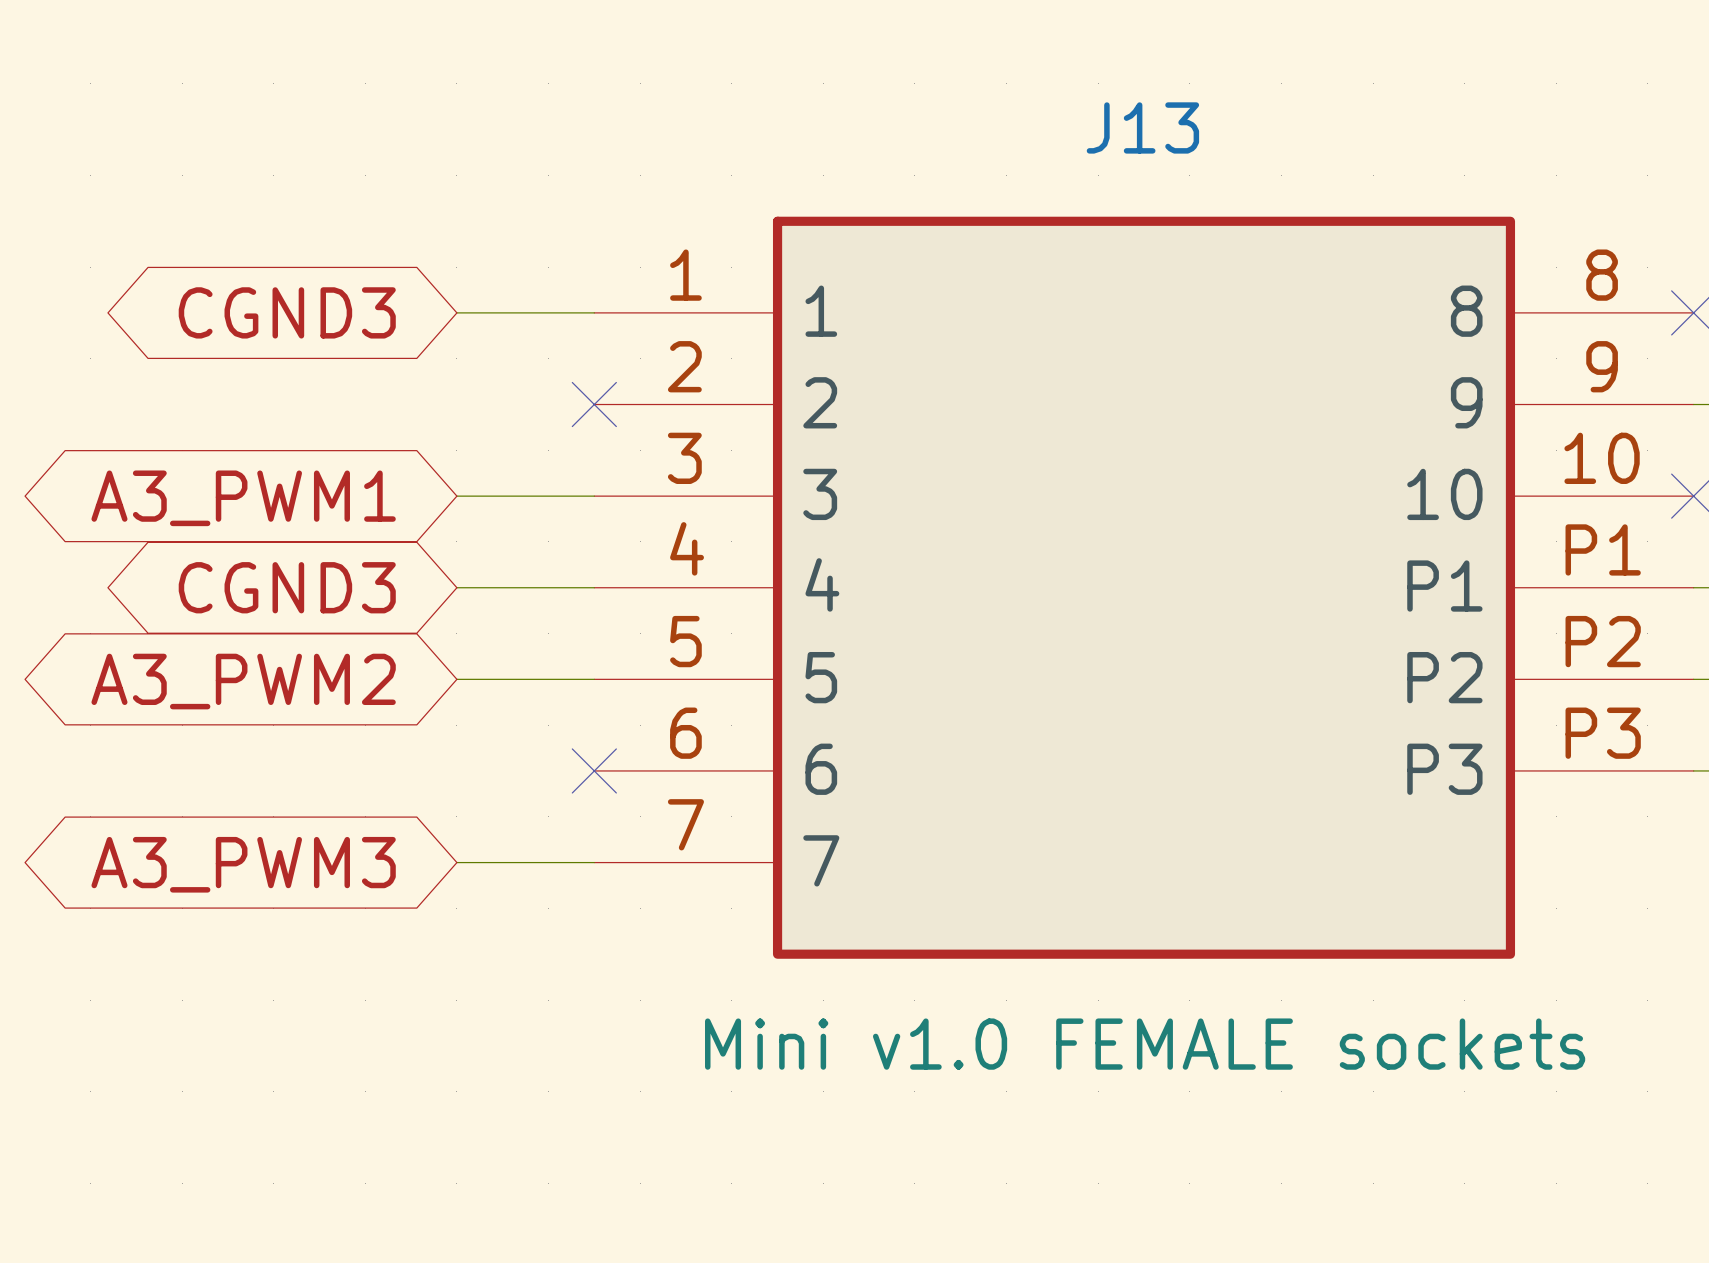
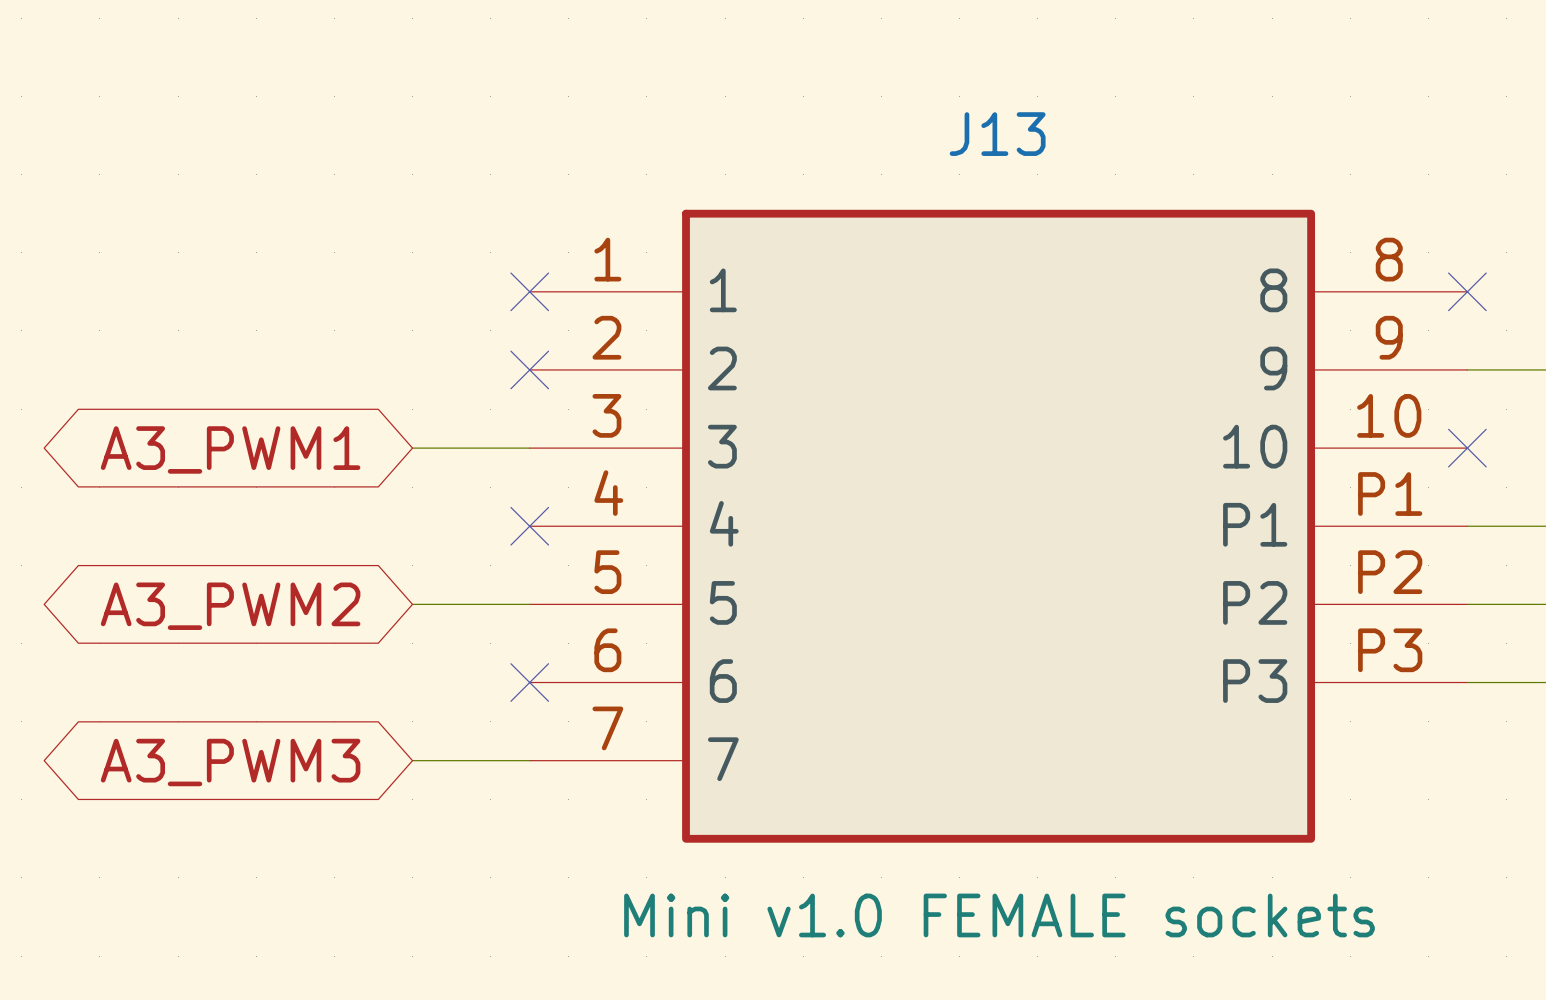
global label: CGND3 (287, 312) -> none
wire: (456, 312) (594, 312) -> none
no-connect mark: none -> (529, 291)
global label: CGND3 (287, 587) -> none
wire: (456, 587) (594, 587) -> none
no-connect mark: none -> (529, 526)

